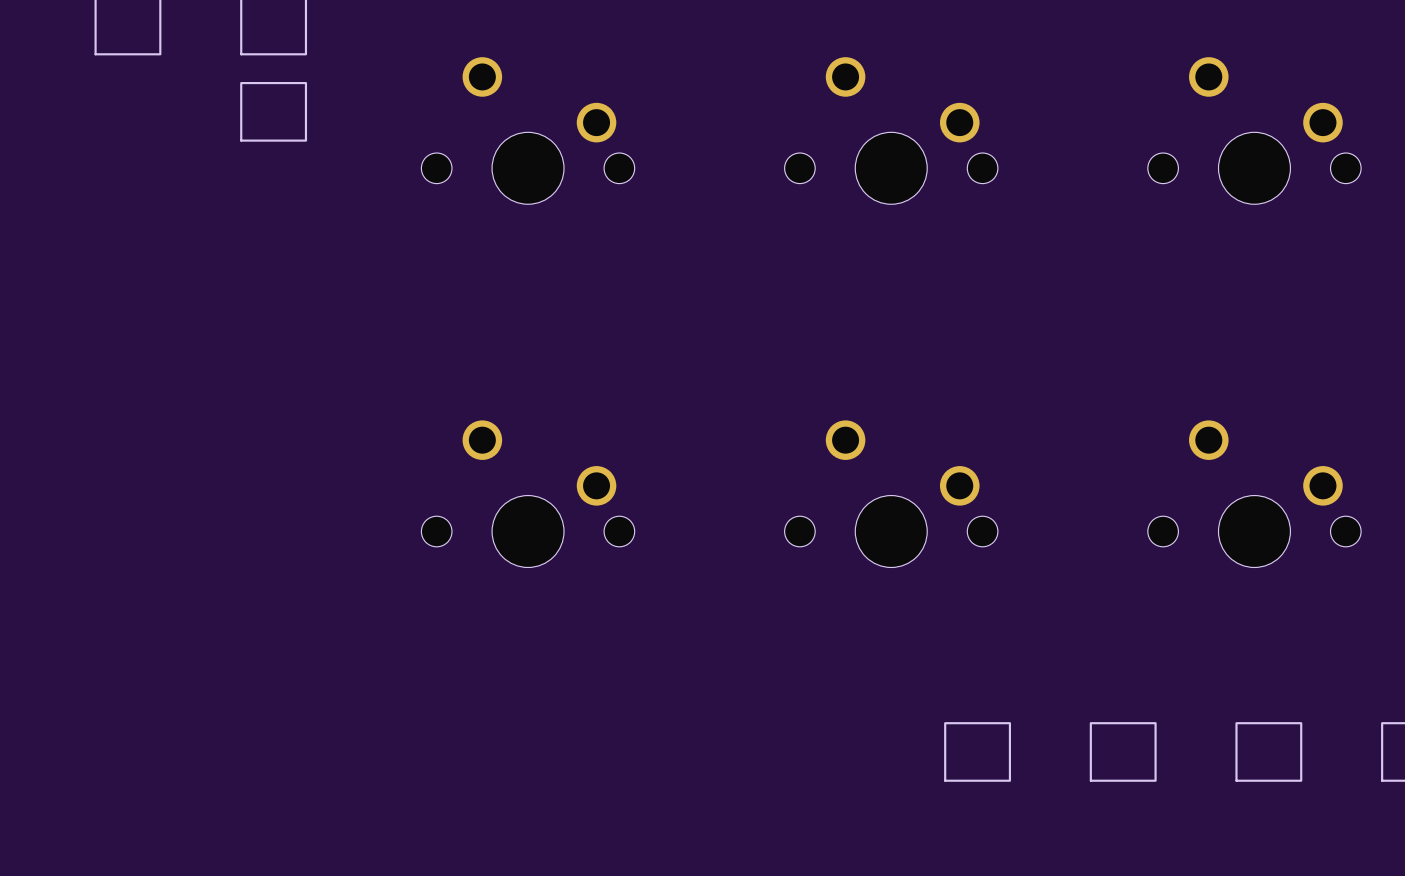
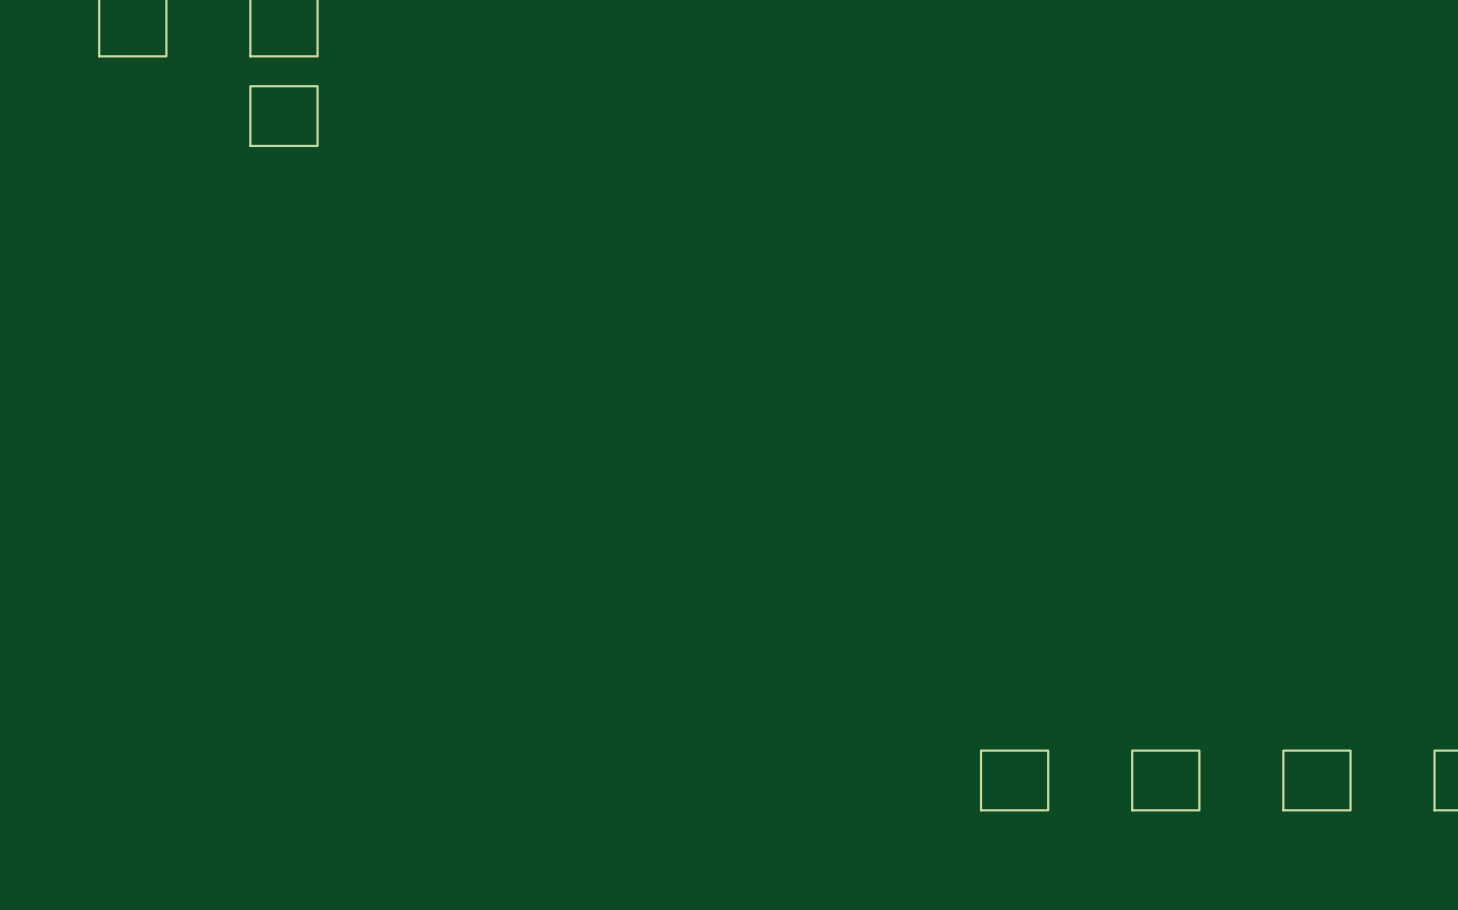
part: (528, 130) -> none
part: (891, 130) -> none
part: (1254, 130) -> none
part: (528, 493) -> none
part: (891, 493) -> none
part: (1254, 493) -> none

